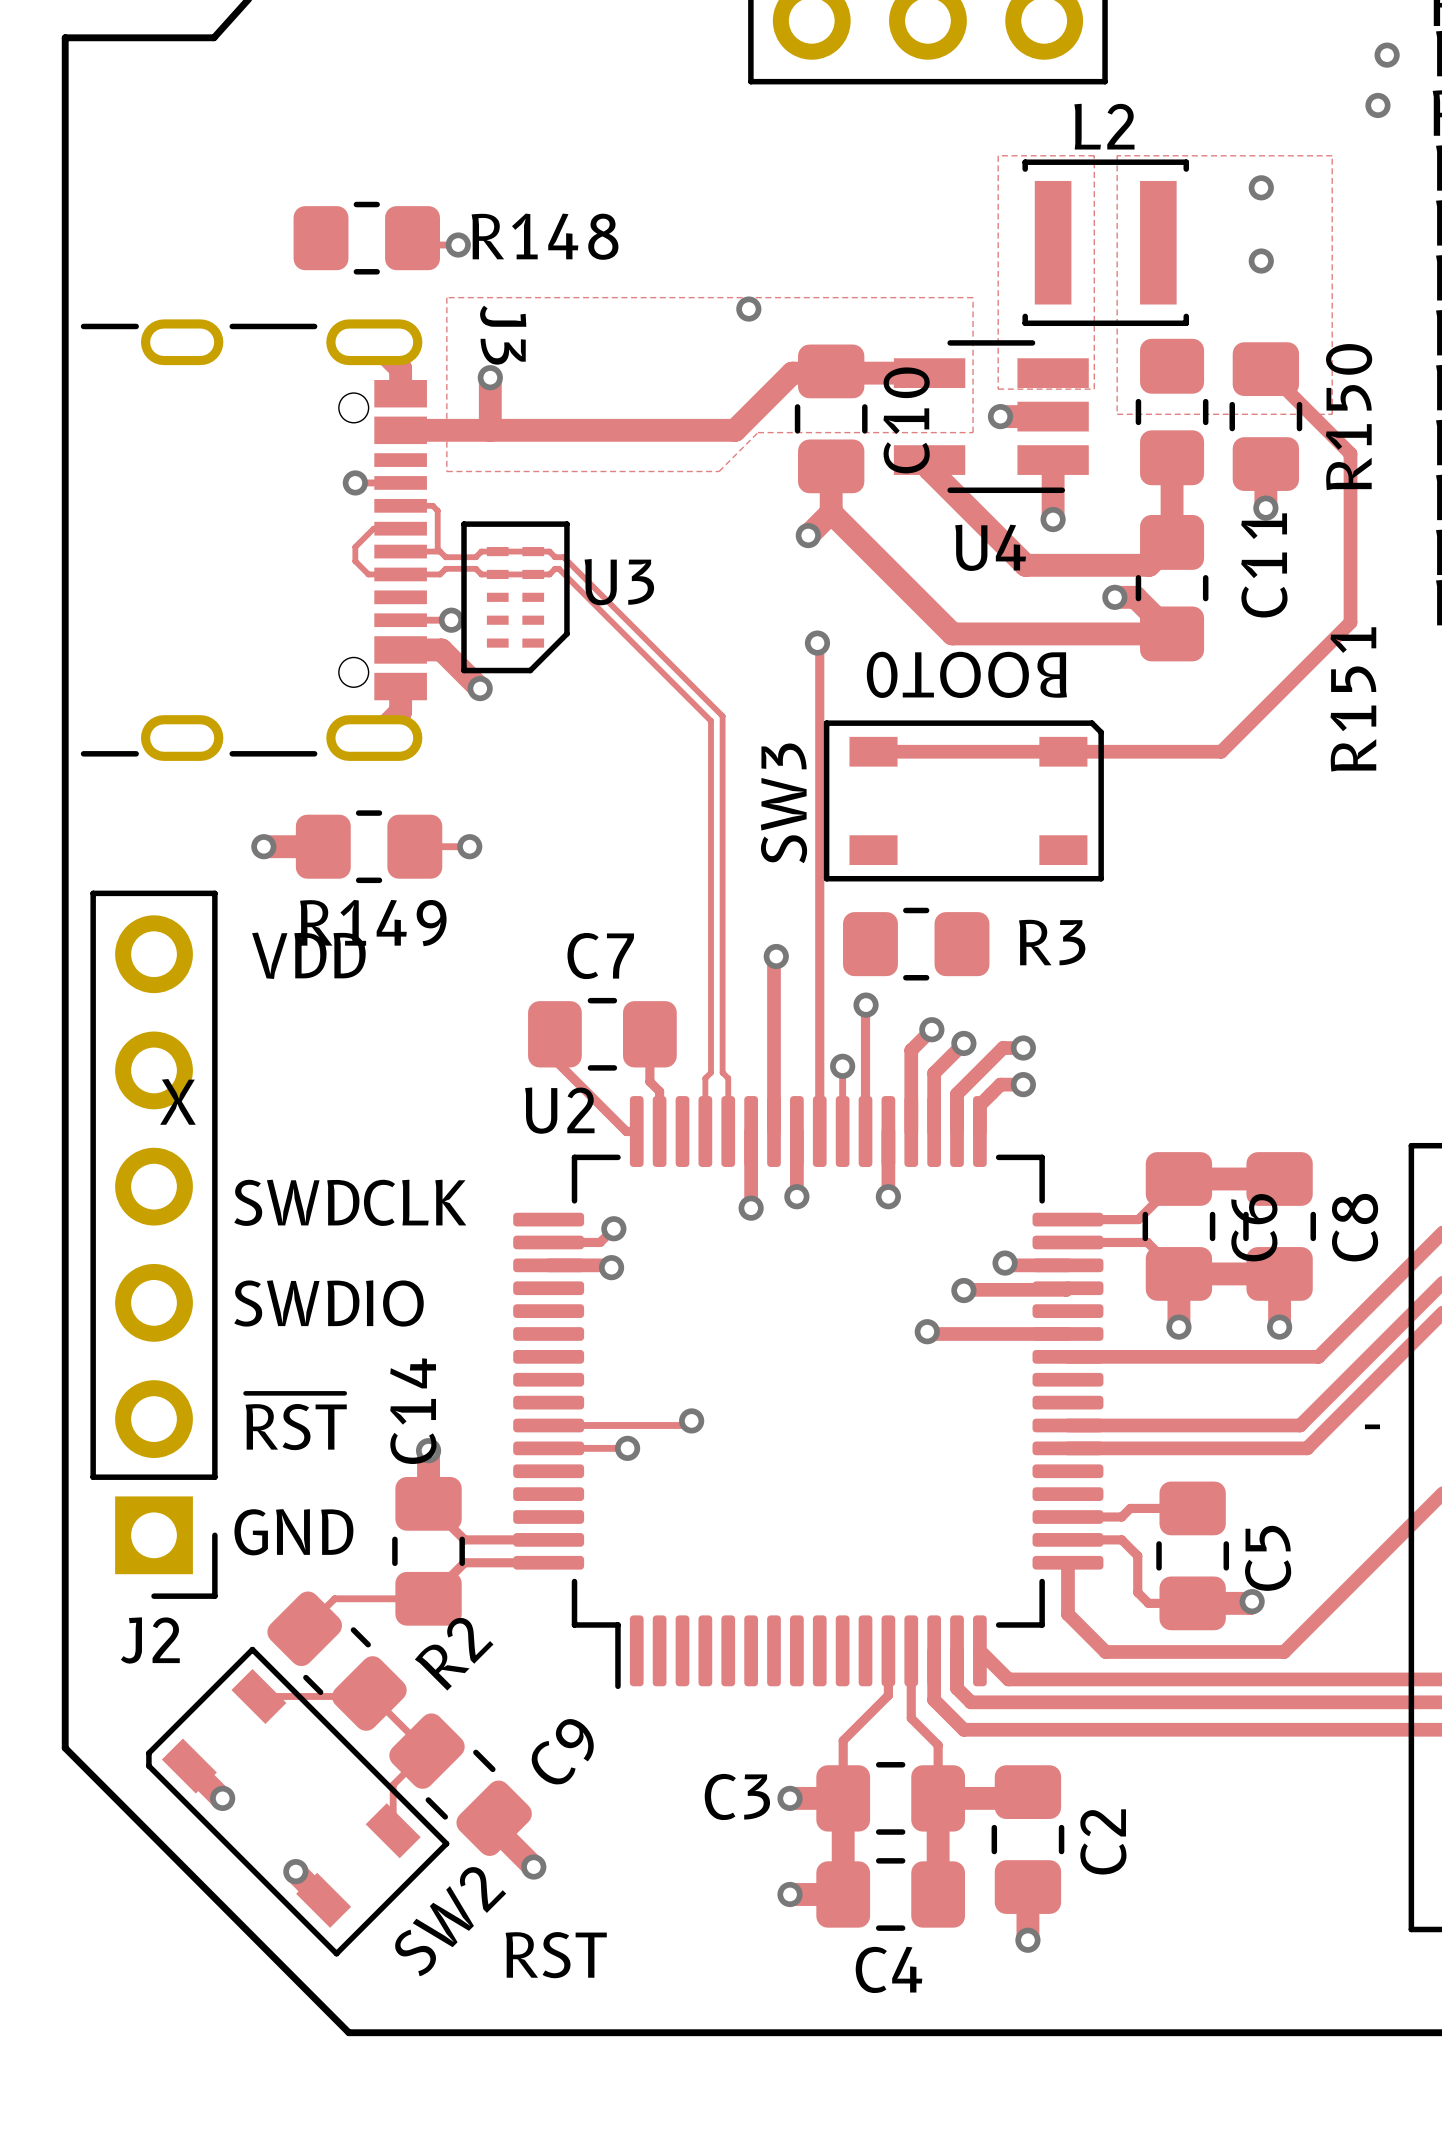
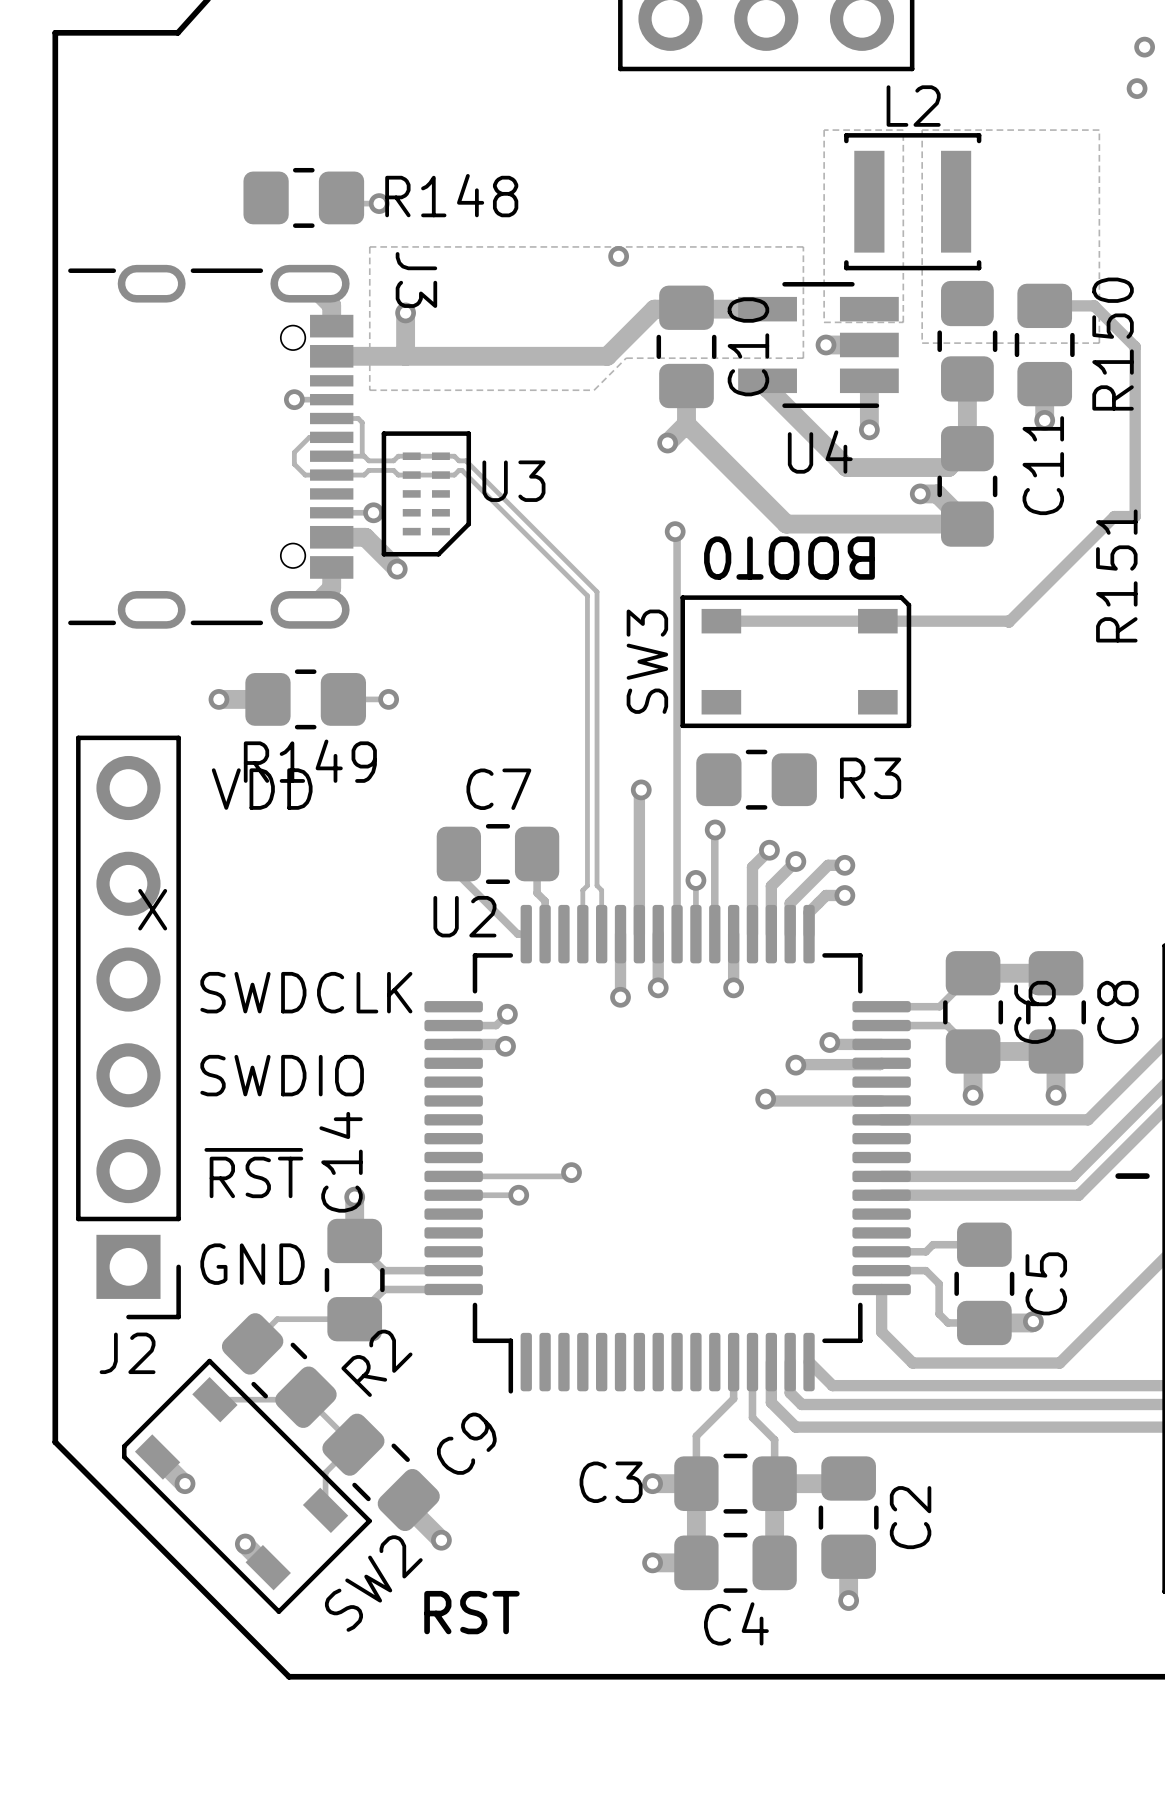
via: (1261, 187) -> none
via: (1261, 261) -> none
track: (1265, 369) (1350, 453) (1350, 622) (1221, 751) -> (1044, 305) (1094, 305) (1135, 346) (1135, 516) (1114, 516) (1007, 621)

